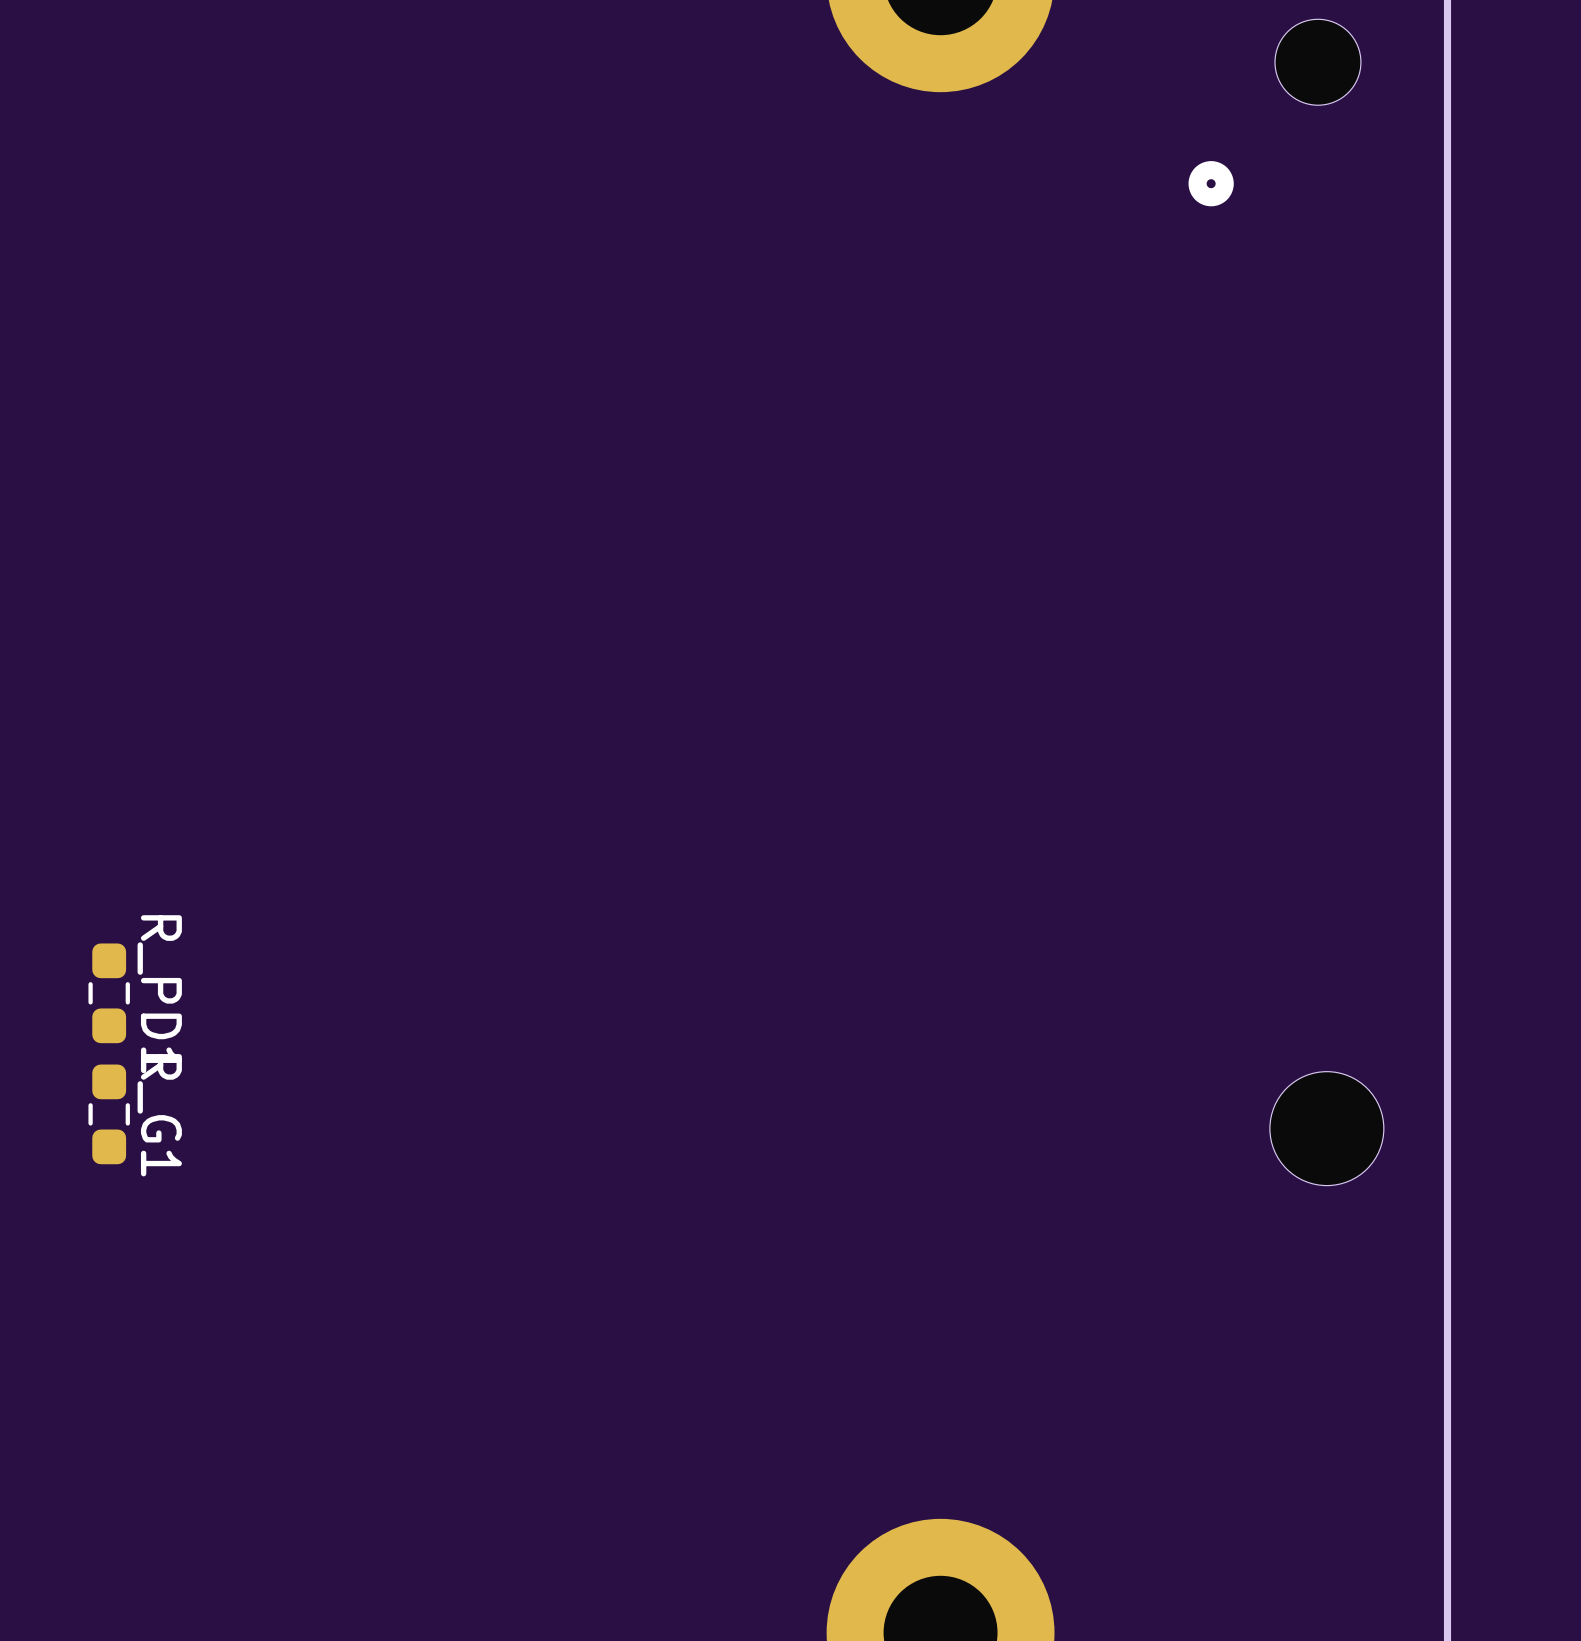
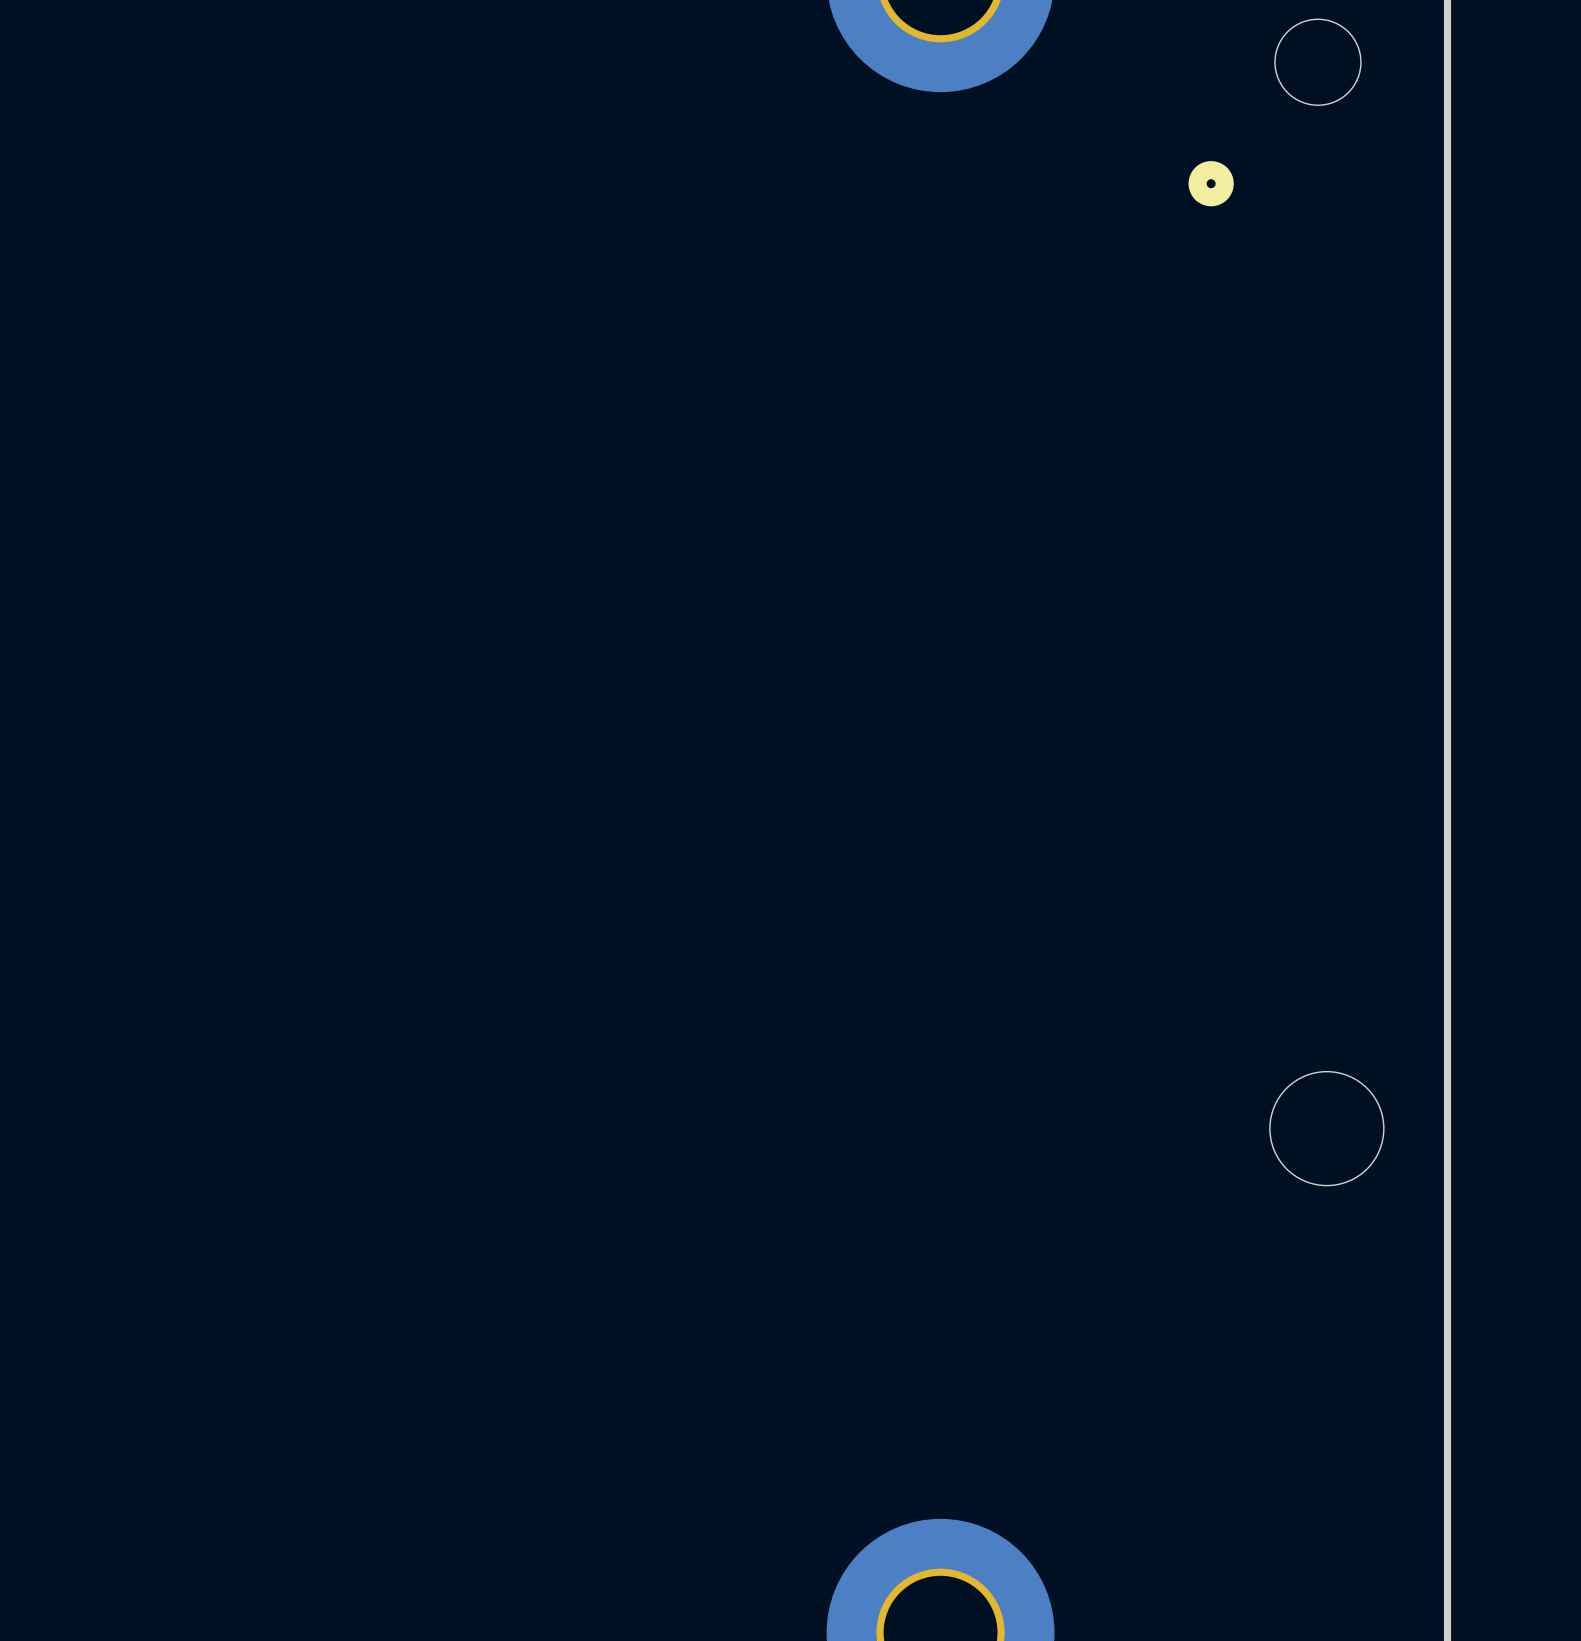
R_PD1: (109, 993) -> none
R_G1: (109, 1114) -> none

